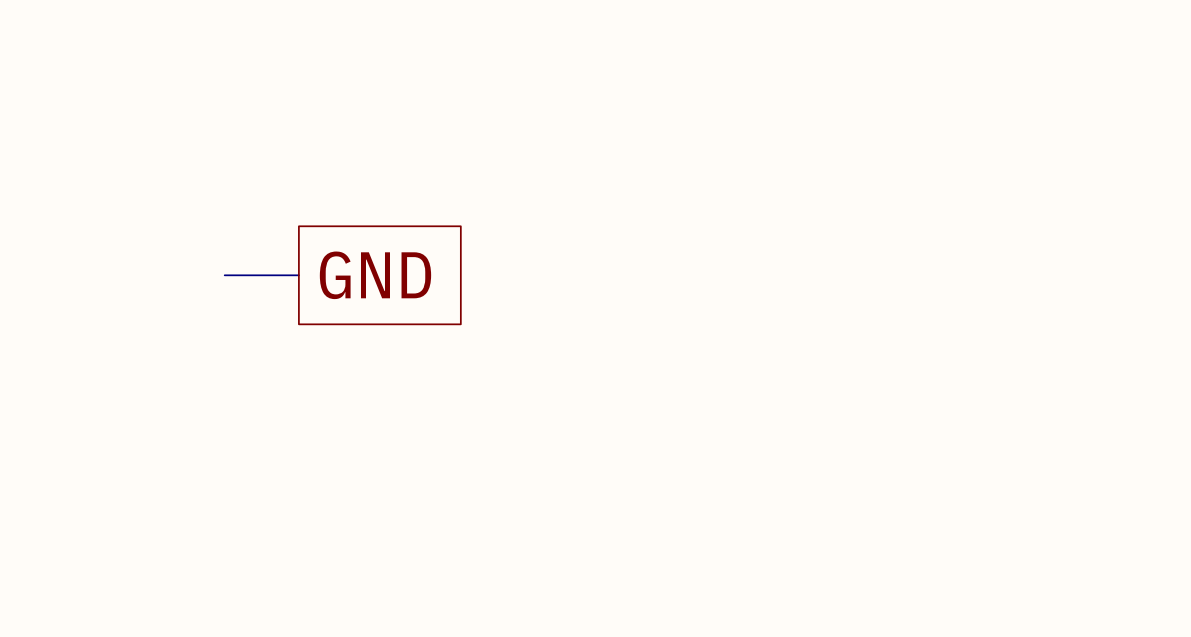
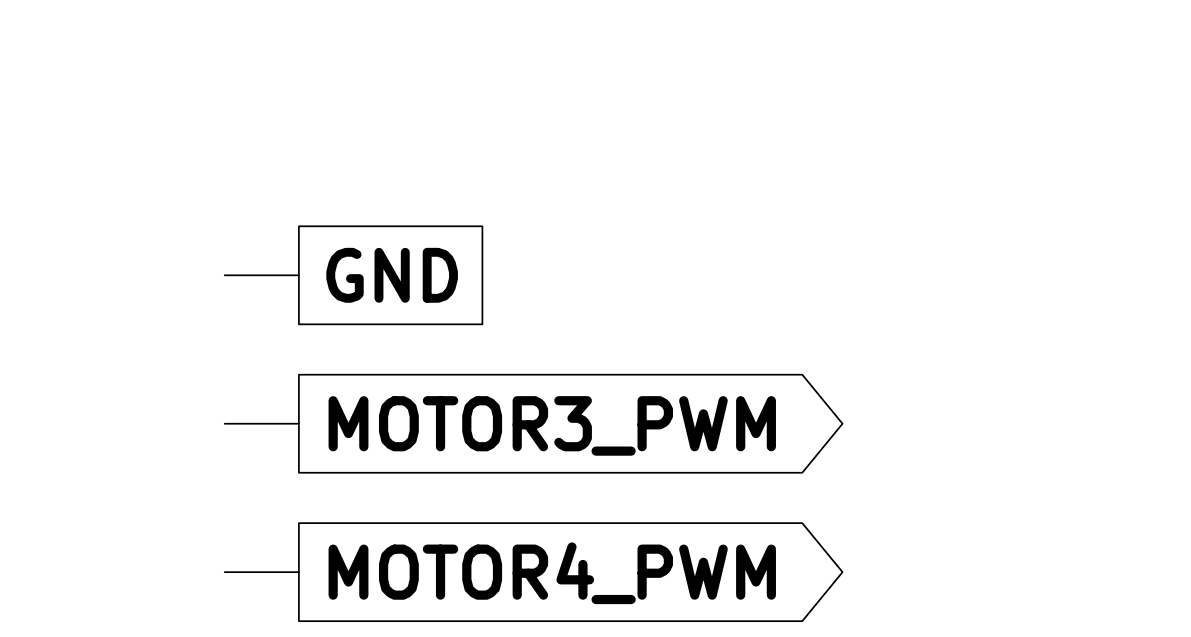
wire: none -> (224, 423) (298, 423)
global label: none -> MOTOR3_PWM (552, 425)
wire: none -> (224, 572) (298, 572)
global label: none -> MOTOR4_PWM (552, 573)

